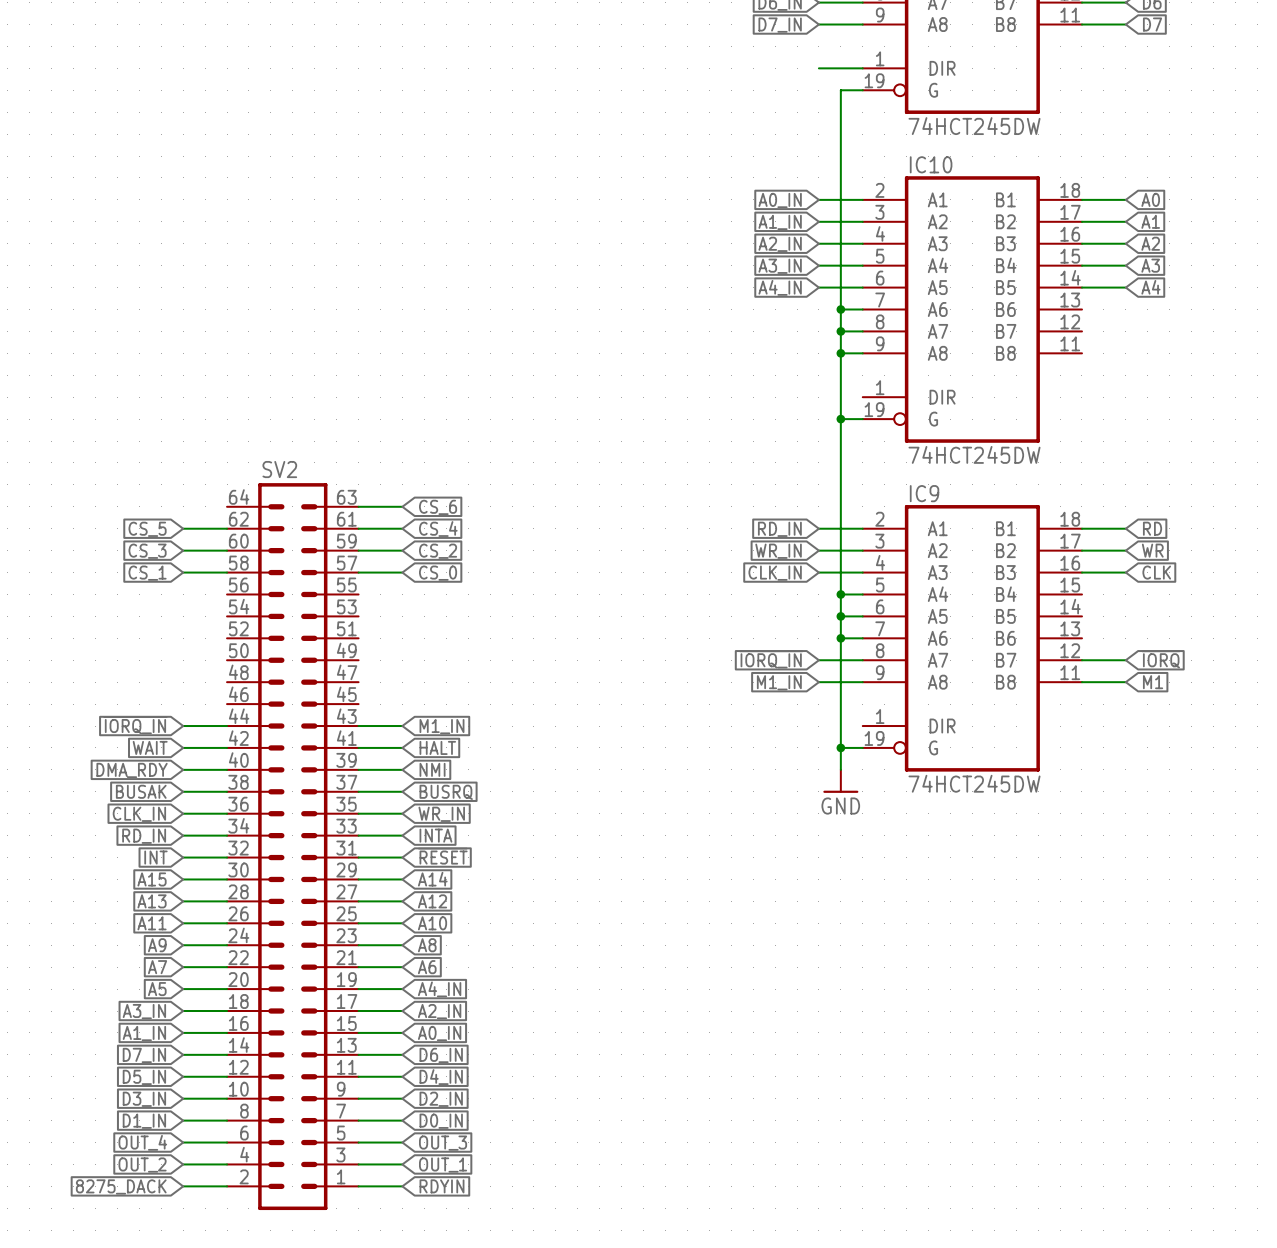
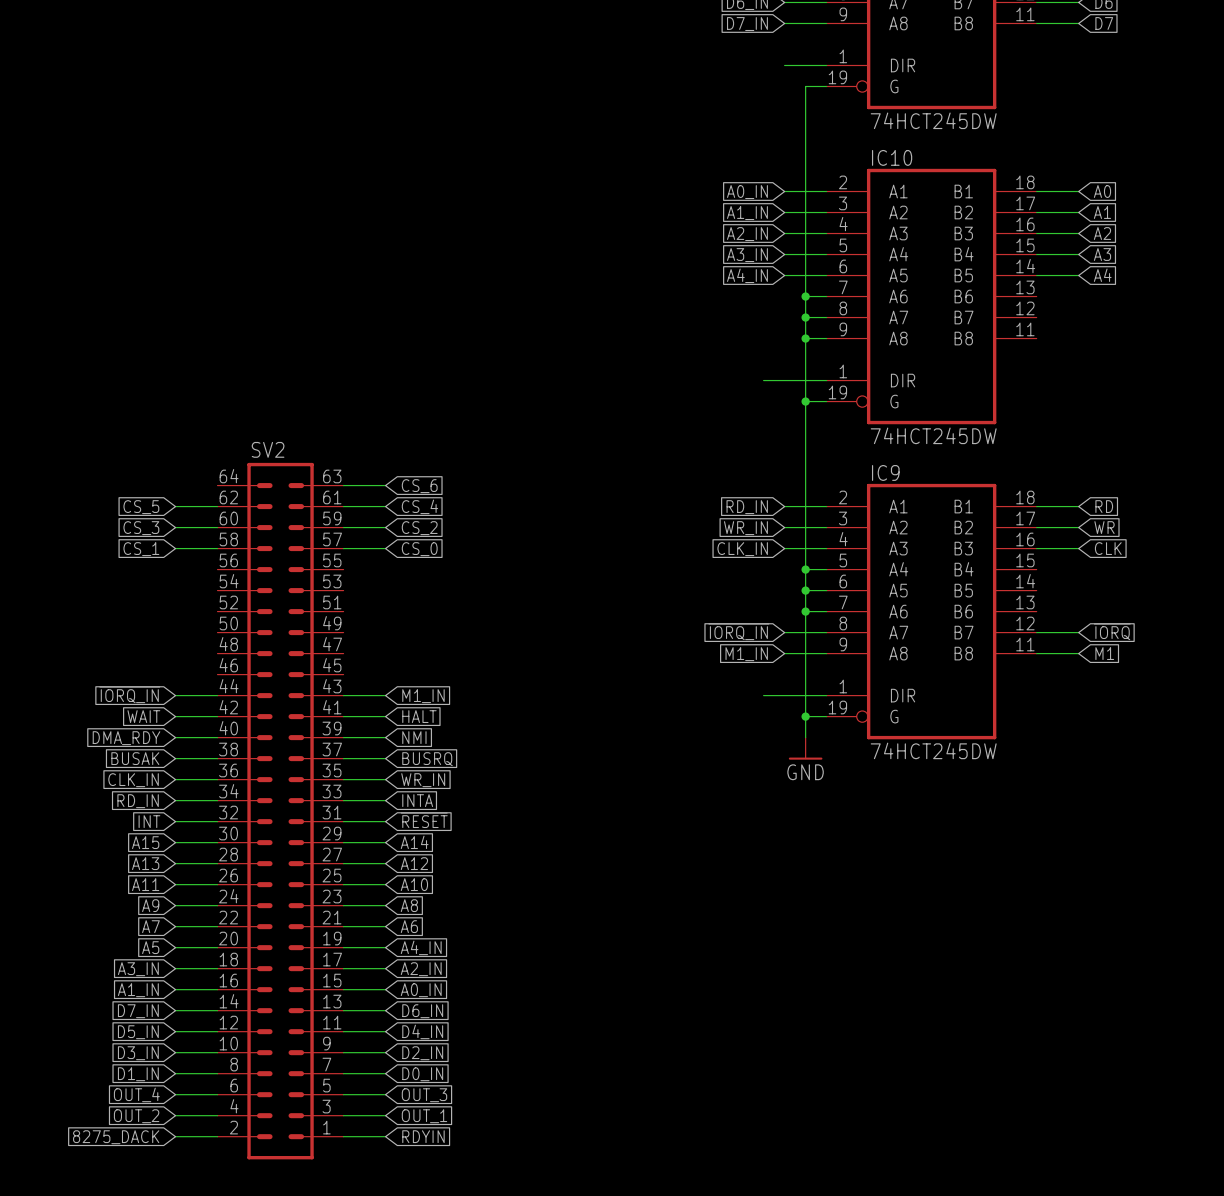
wire: none -> (763, 380) (826, 380)
wire: none -> (763, 695) (826, 695)

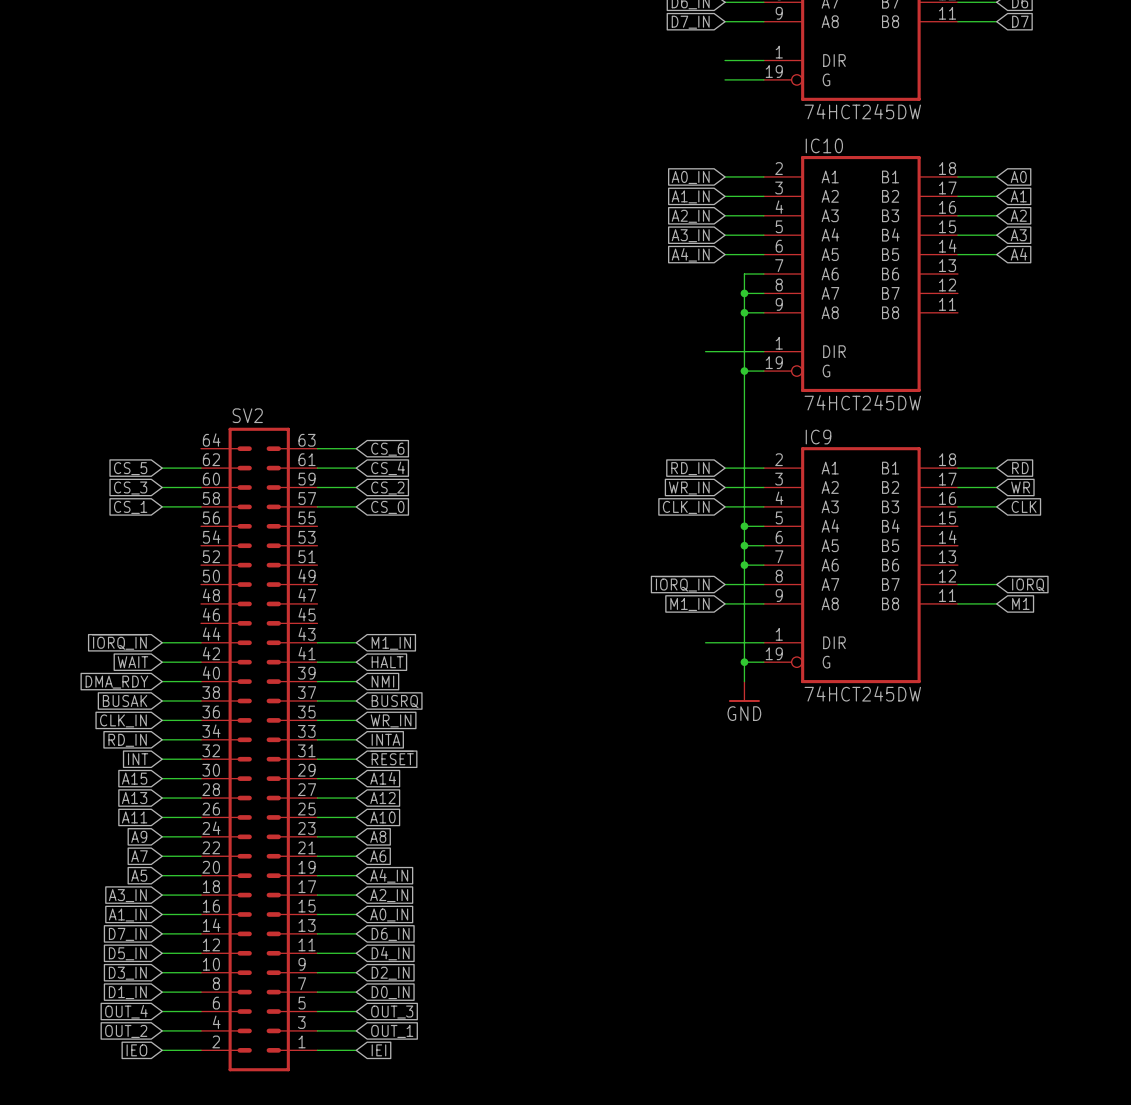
wire: (805, 86) (805, 296) -> (744, 79) (725, 79)
junction: (805, 296) -> none
global label: RDYIN (423, 1136) -> IEI (378, 1050)
global label: 8275_DACK (116, 1137) -> IEO (136, 1050)

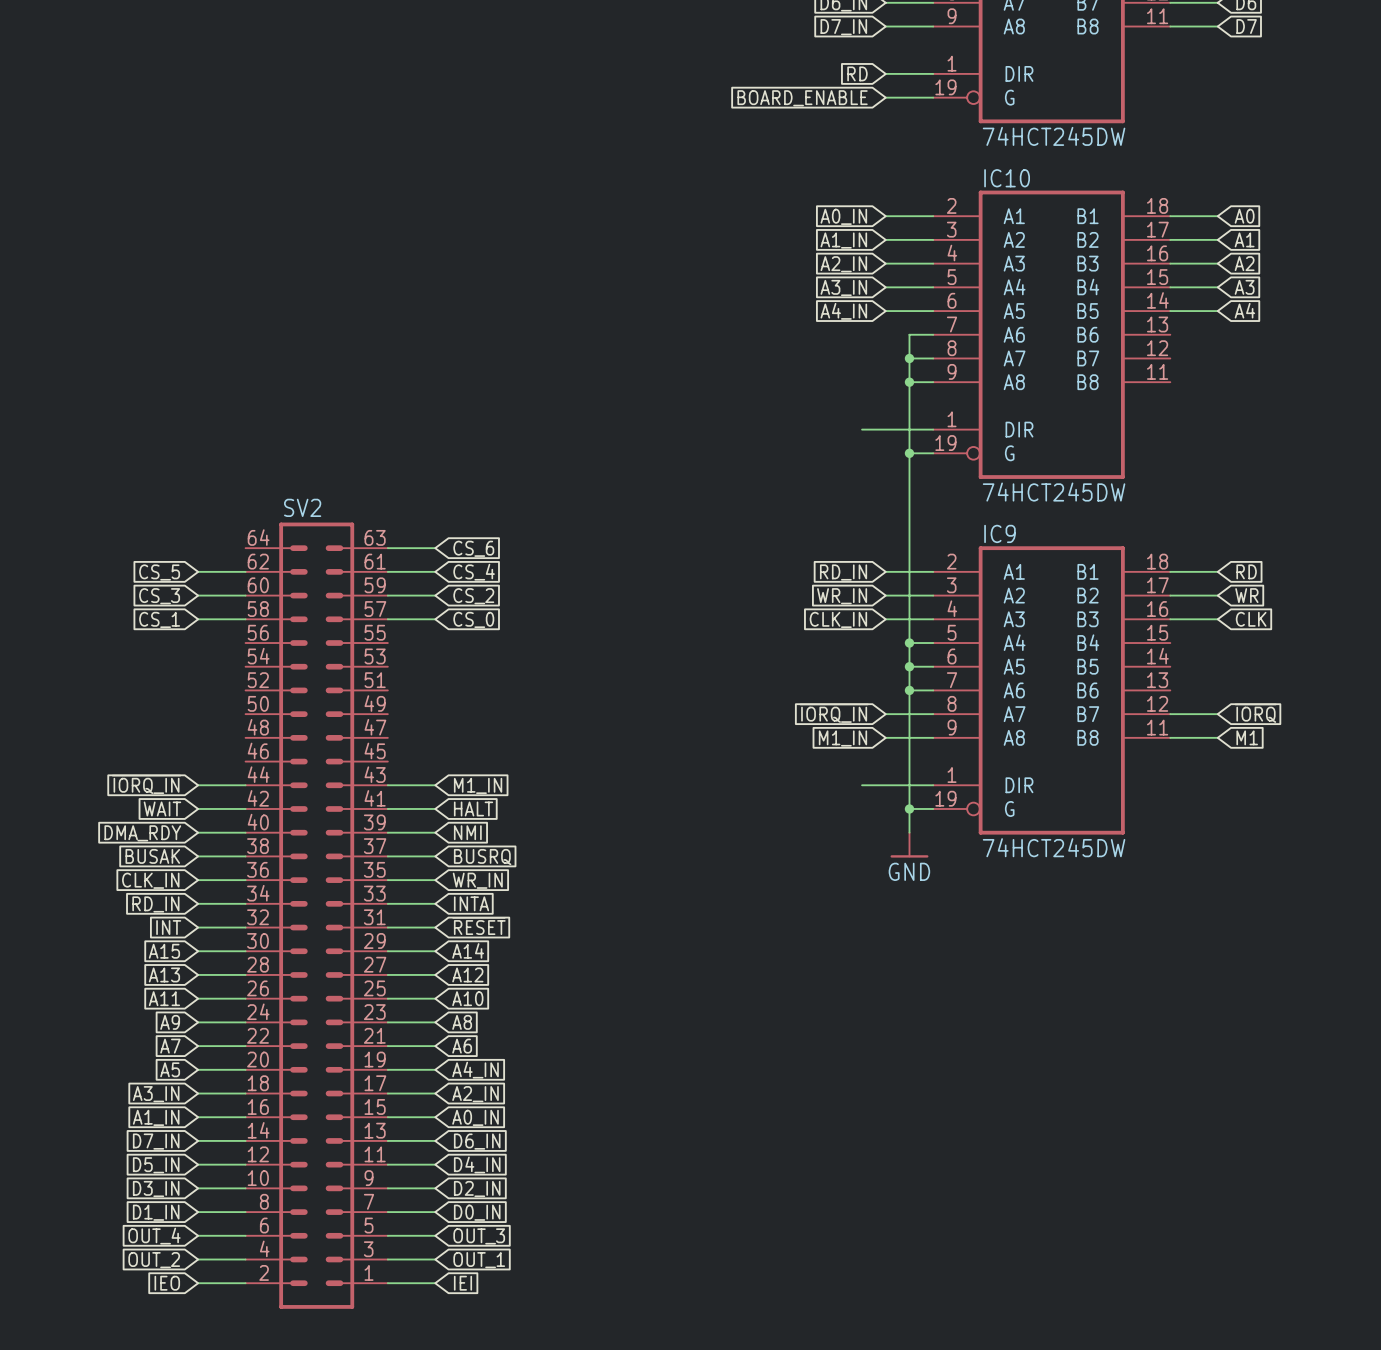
global label: none -> RD (857, 73)
global label: none -> BOARD_ENABLE (802, 98)

